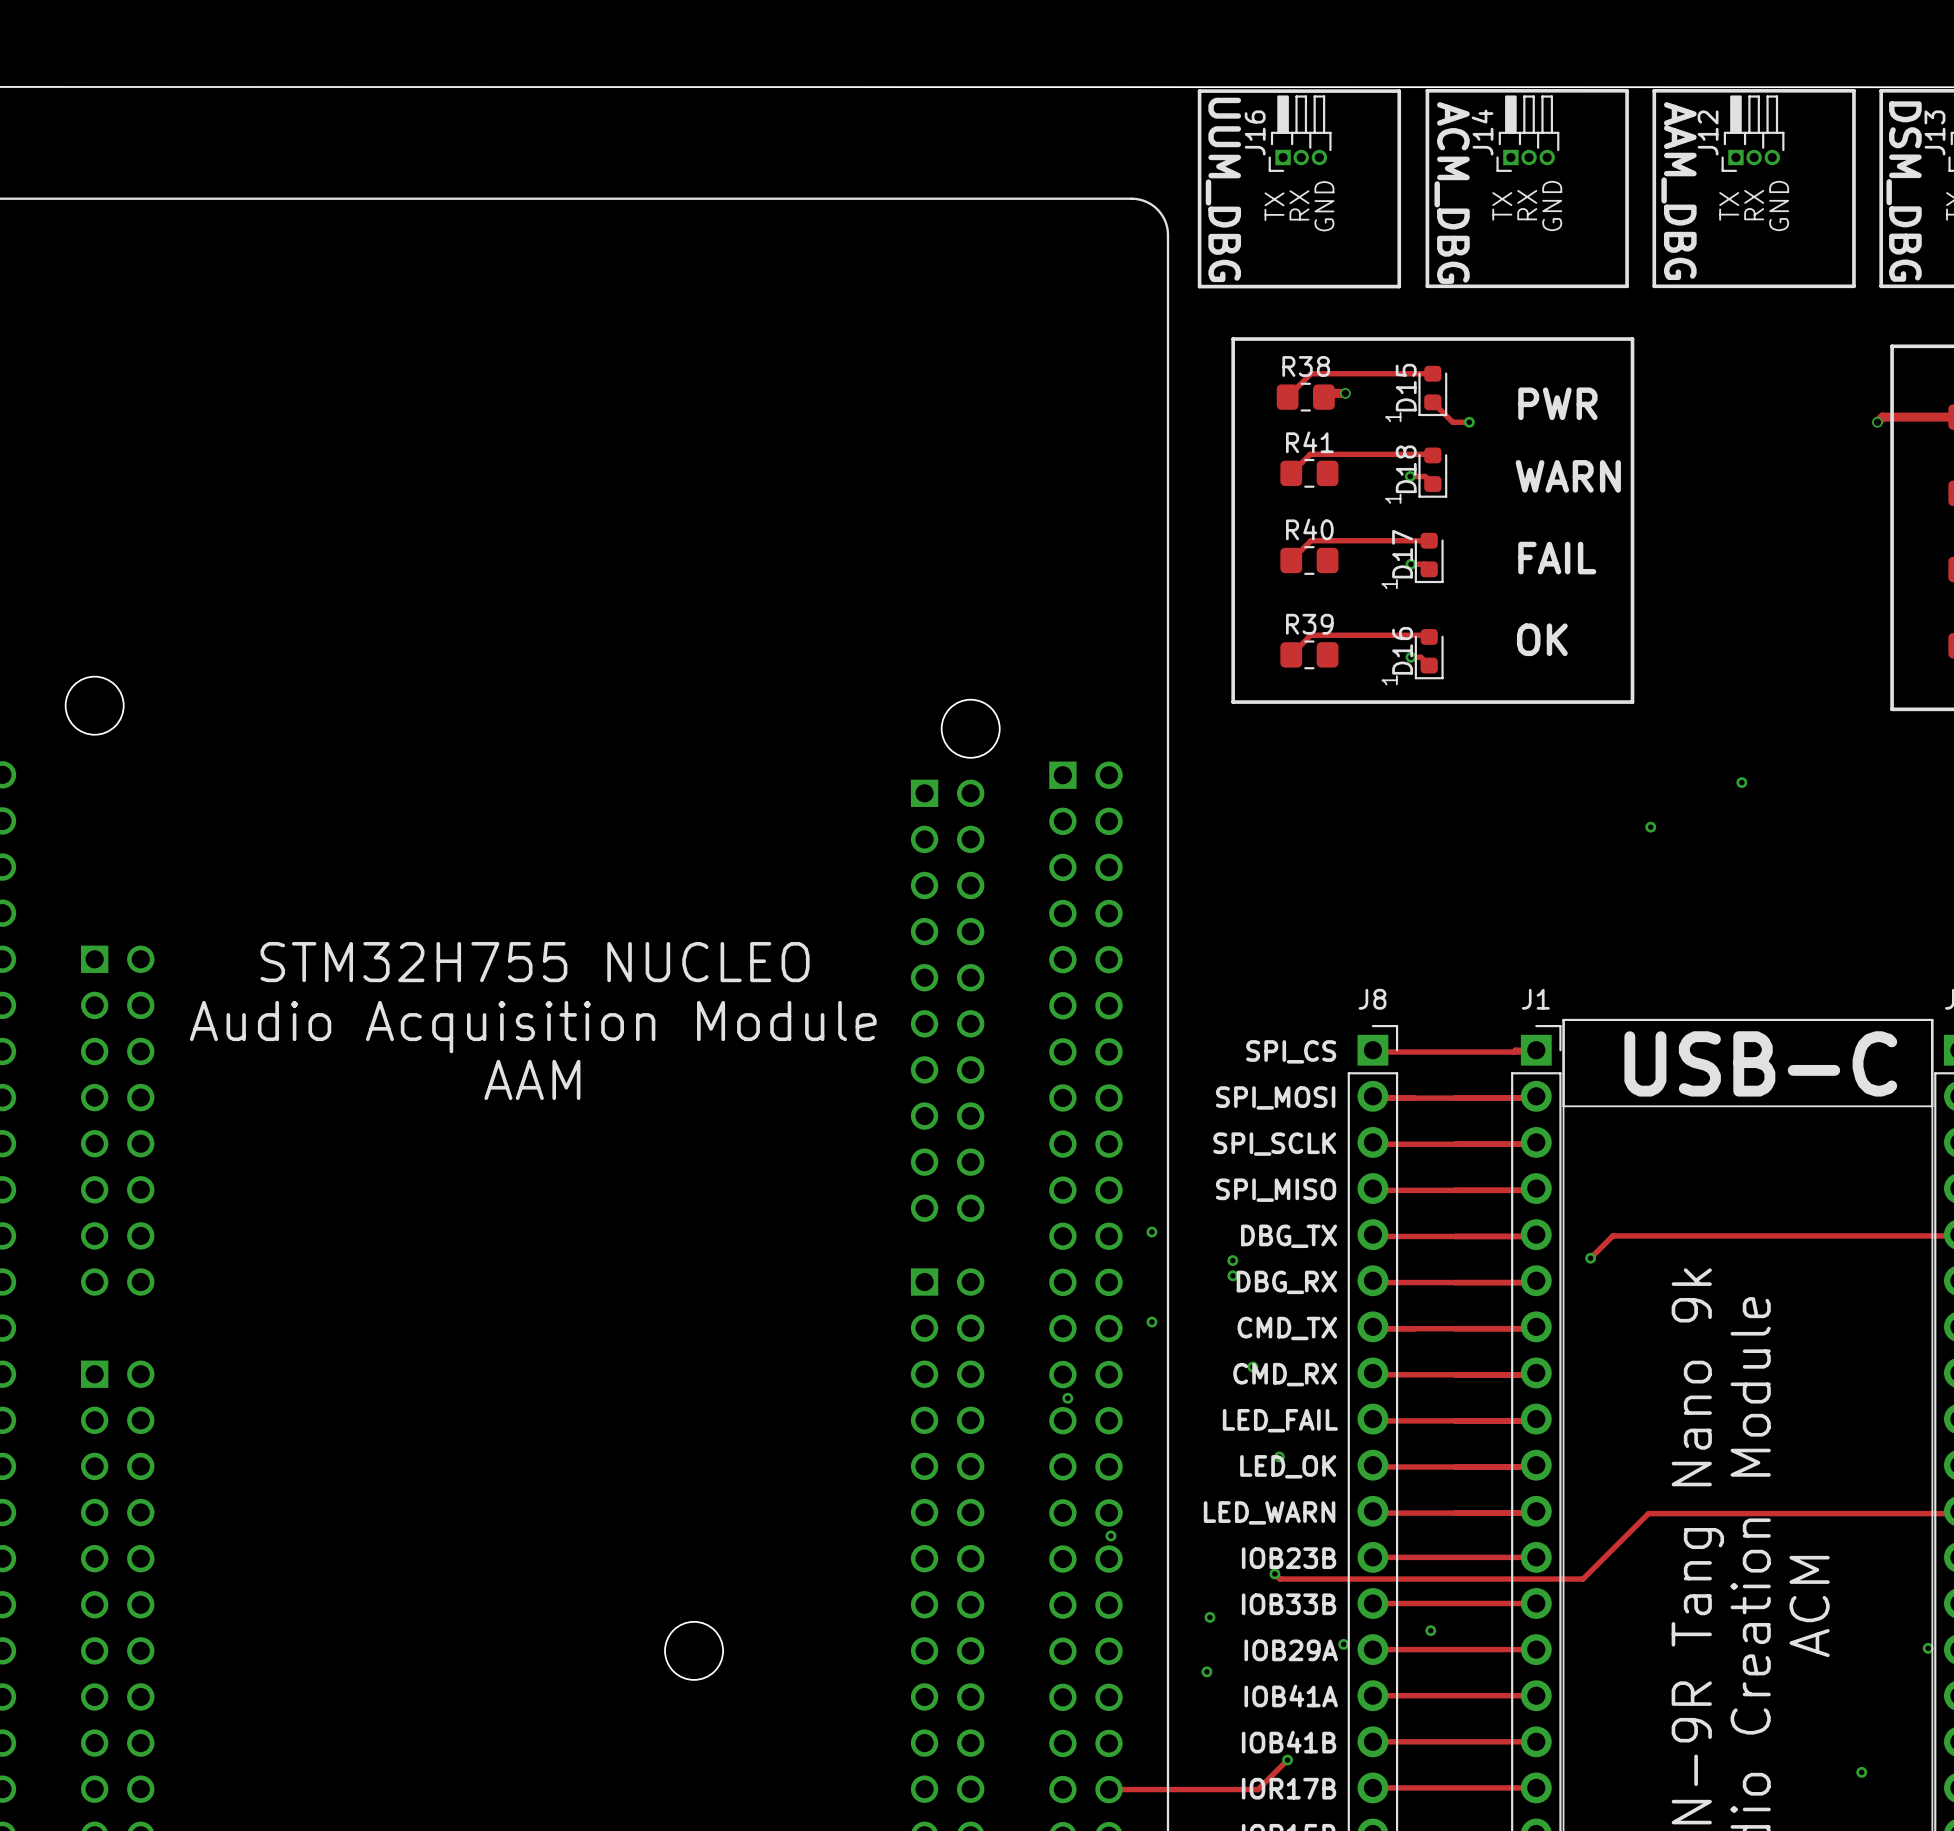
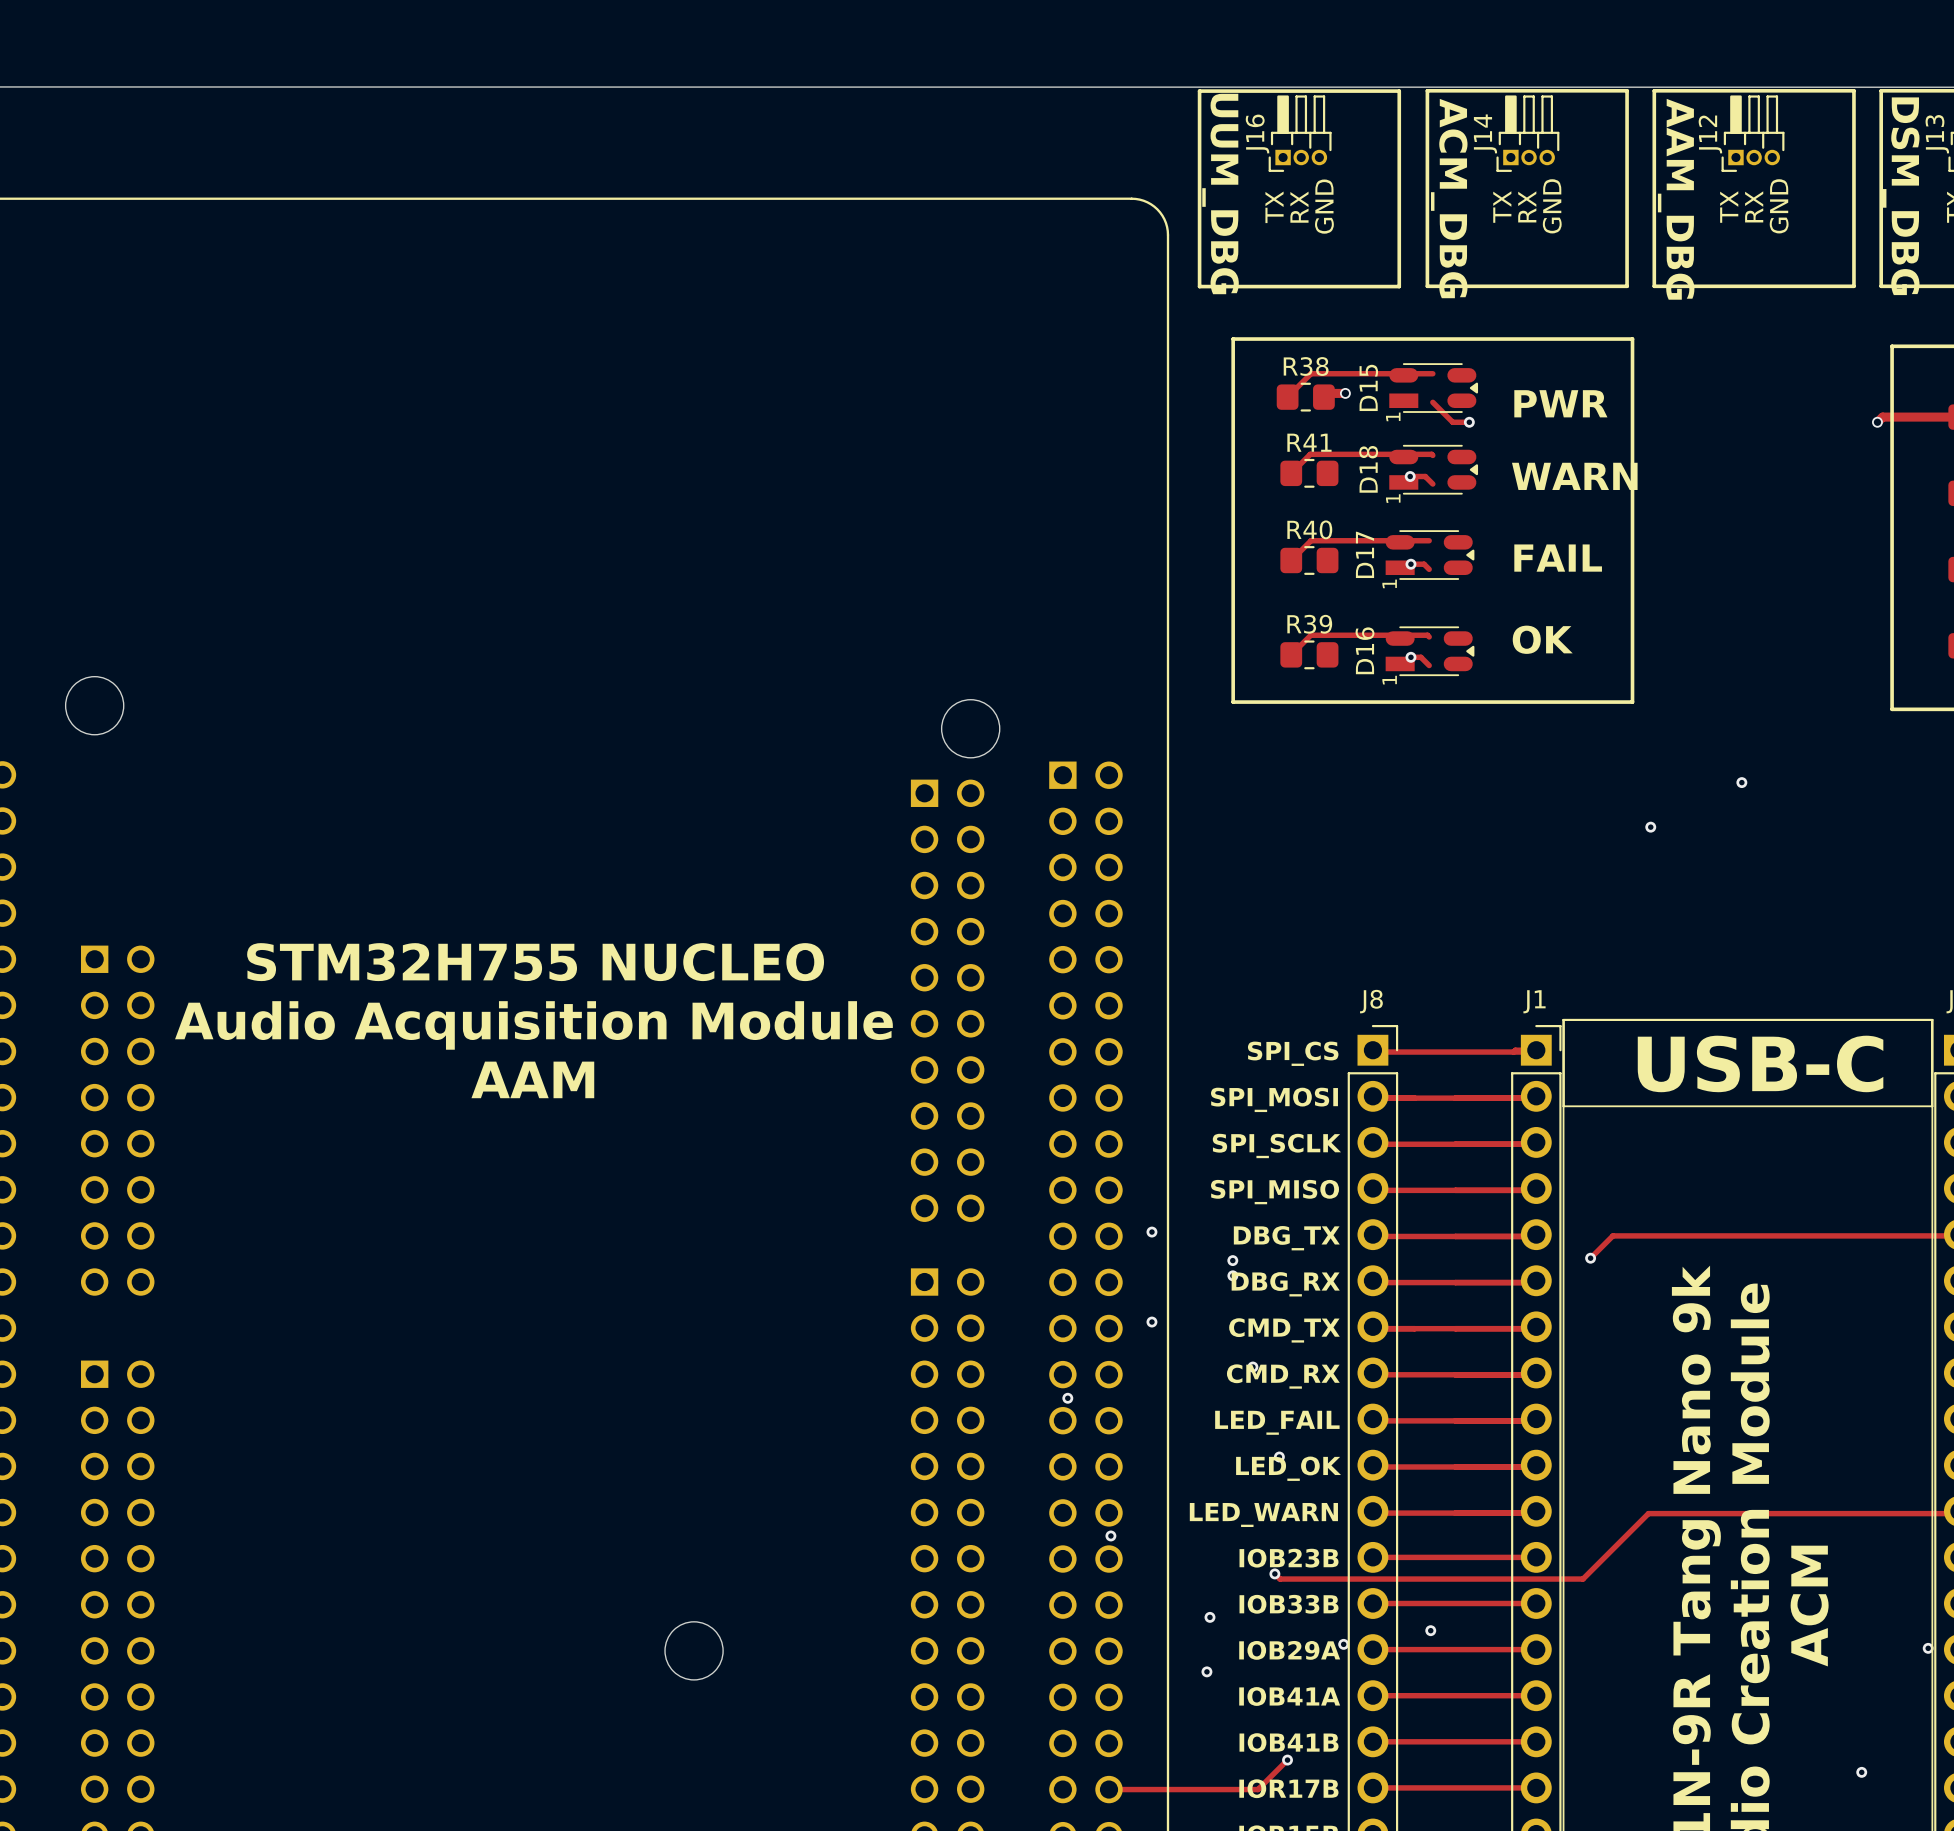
D15 footprint: [1418, 365, 1448, 417] -> [1389, 363, 1479, 413]
D15 name position: D15 (1406, 387) -> D15 (1368, 387)
D18 footprint: [1418, 447, 1448, 498] -> [1389, 444, 1479, 495]
D18 name position: D18 (1406, 469) -> D18 (1368, 469)
D17 footprint: [1414, 532, 1444, 584] -> [1385, 530, 1475, 580]
D17 name position: D17 (1402, 554) -> D17 (1364, 554)
D16 footprint: [1414, 629, 1444, 680] -> [1385, 626, 1475, 677]
D16 name position: D16 (1402, 650) -> D16 (1365, 650)

